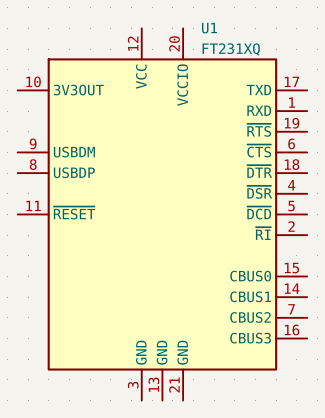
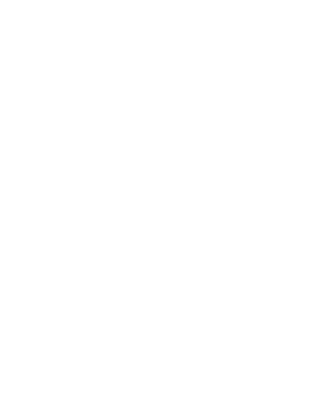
U1: FT231XQ (162, 214) -> none

